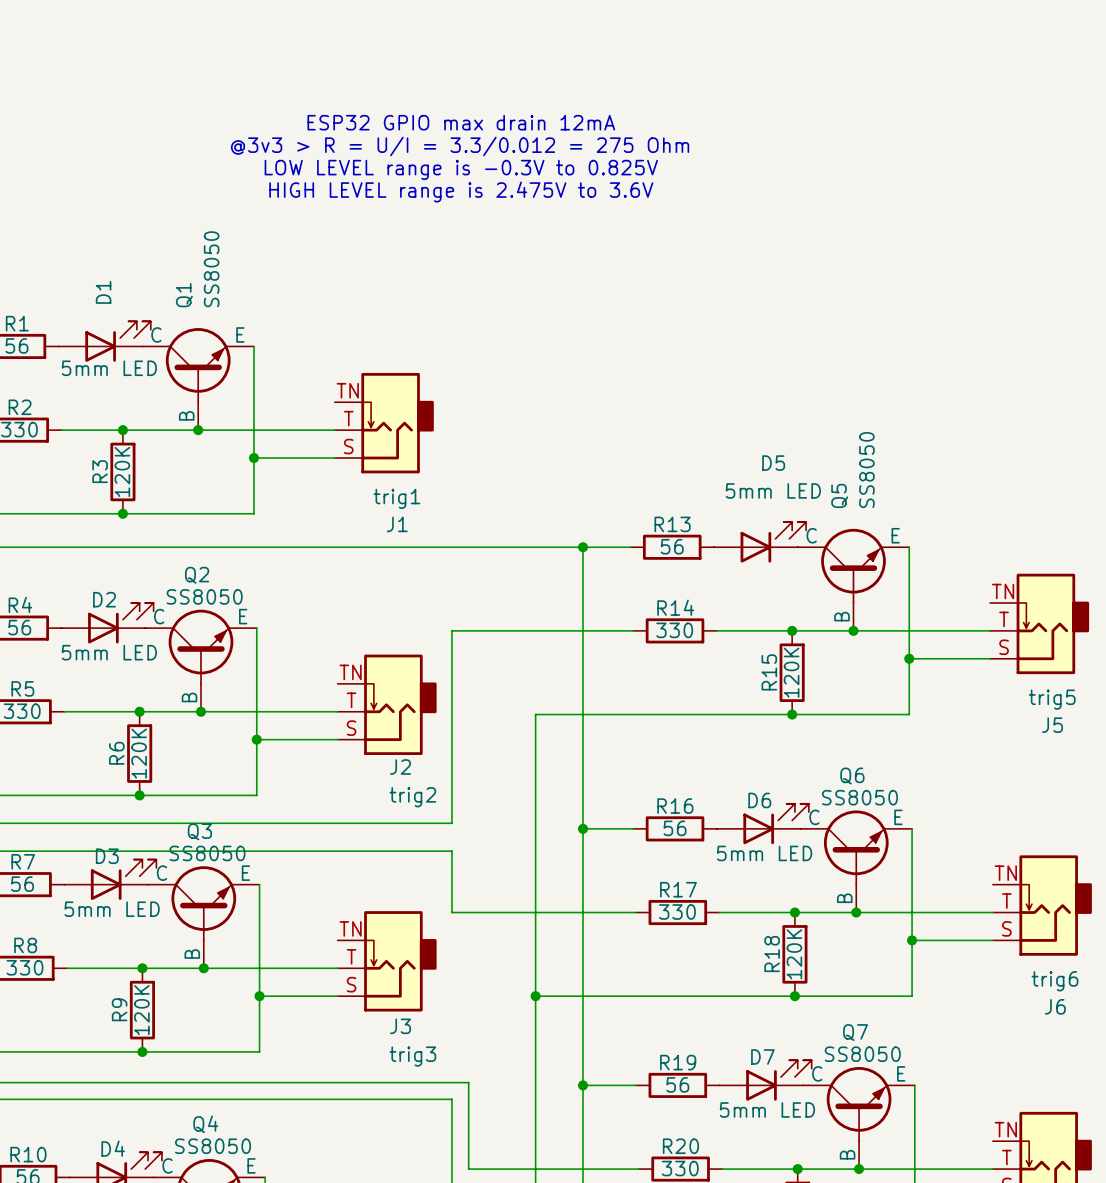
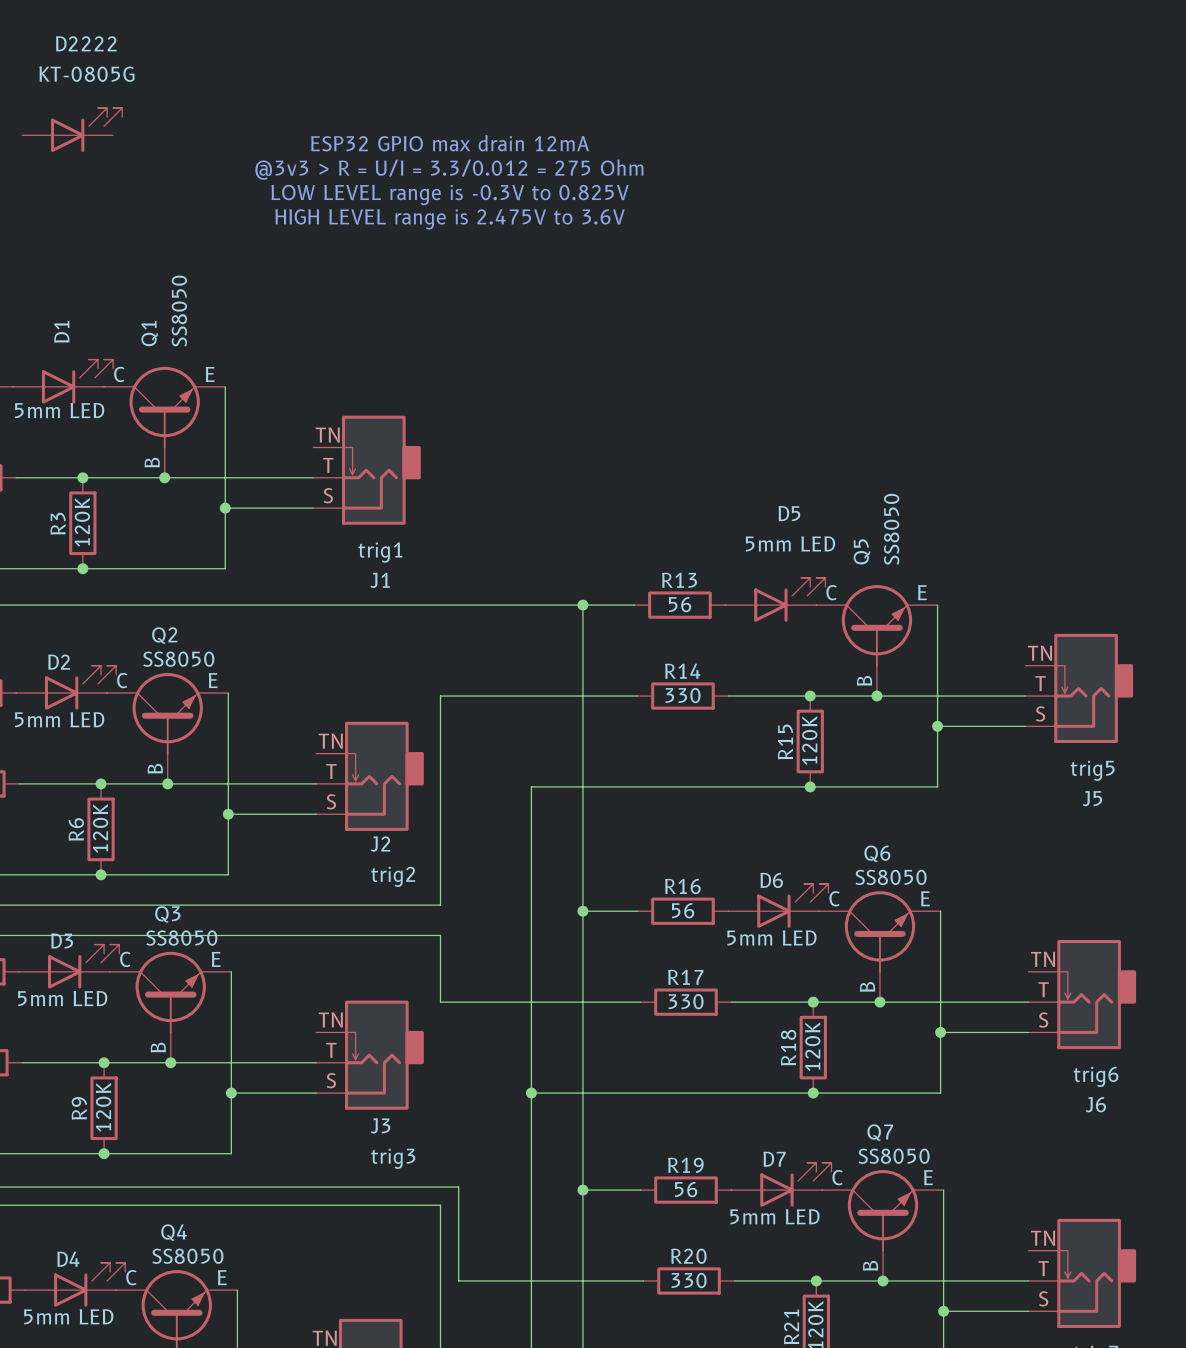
D2222: none -> KT-0805G (72, 129)

